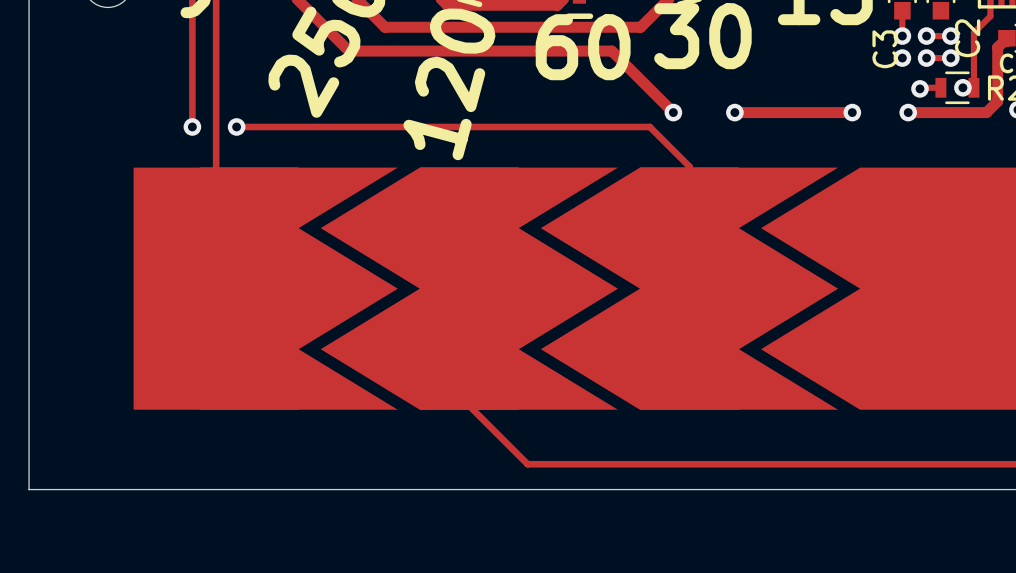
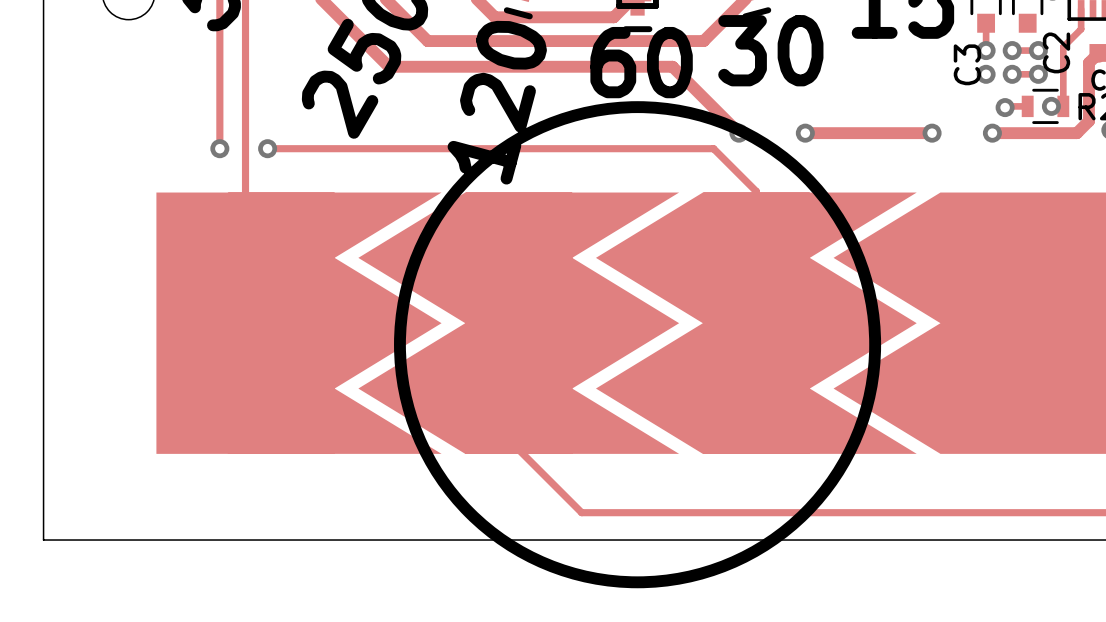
drawing: none -> [394, 101, 882, 589]

